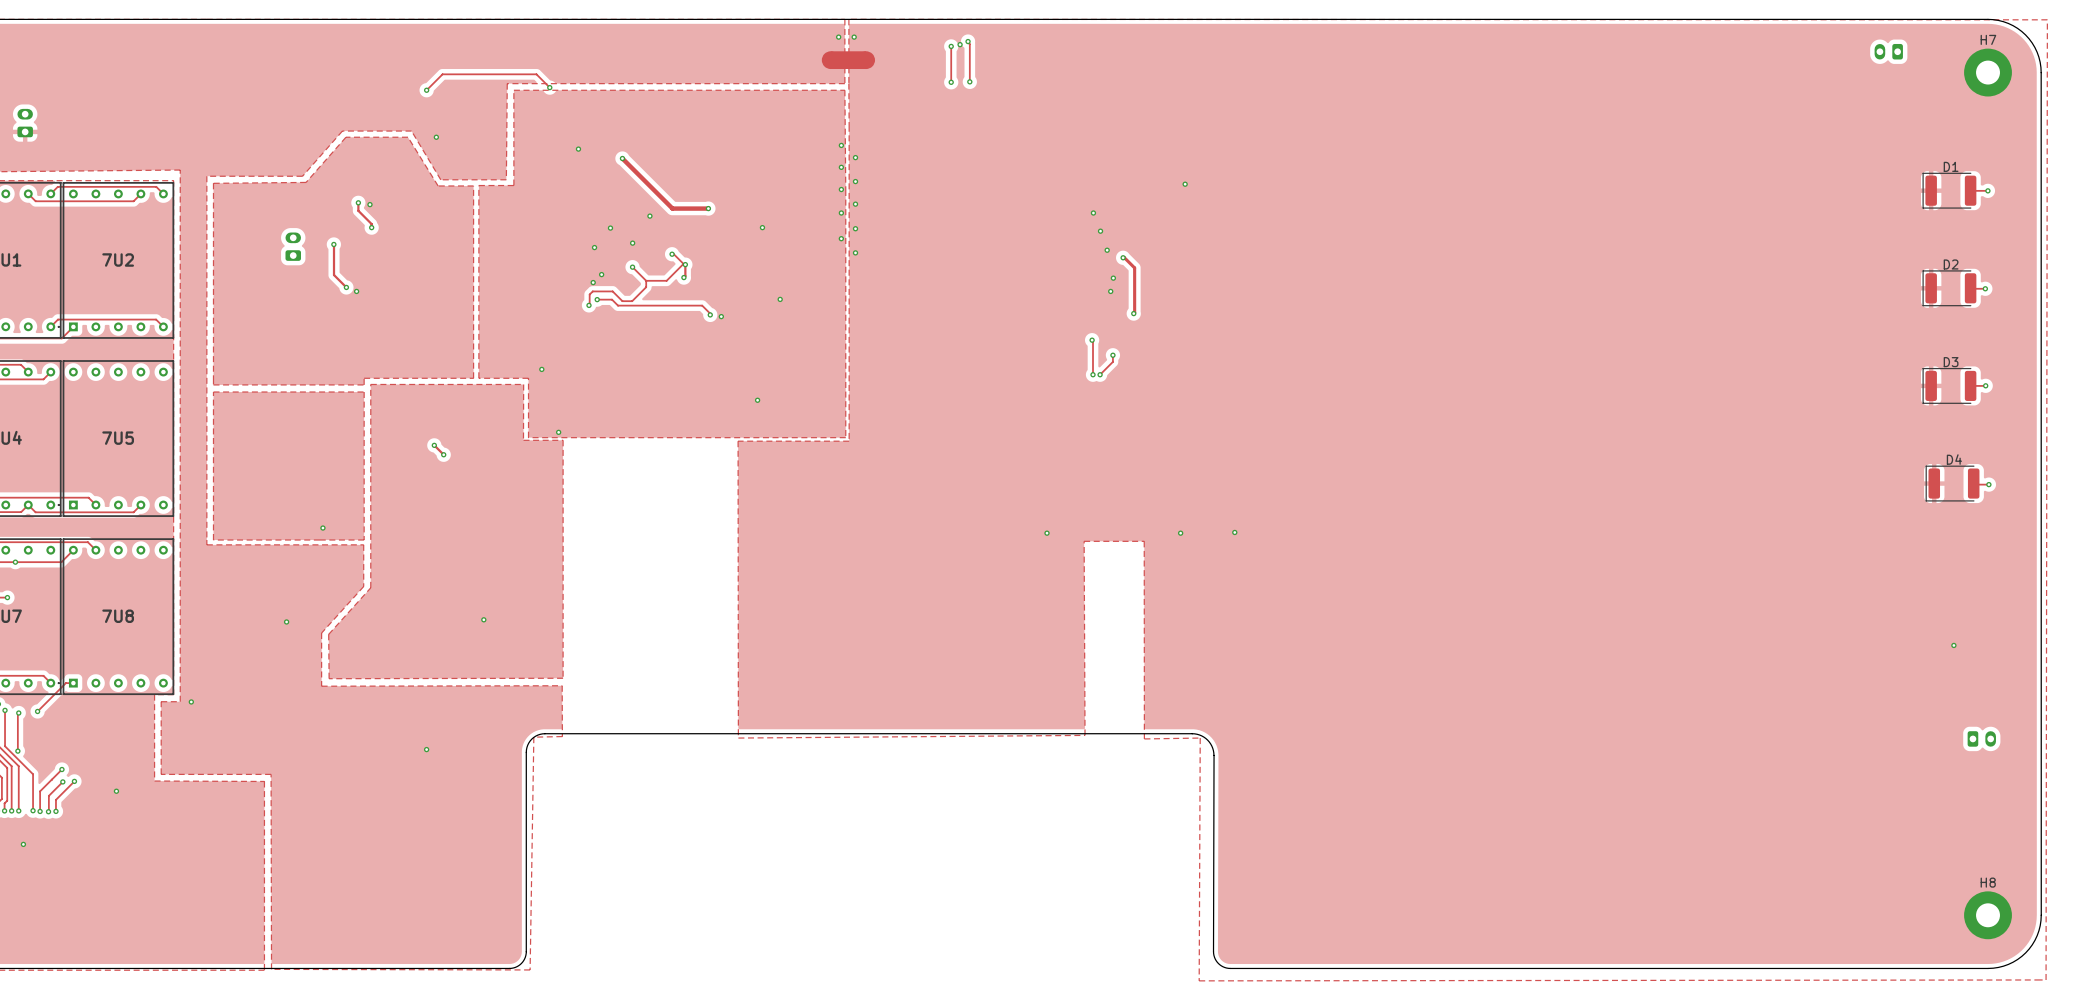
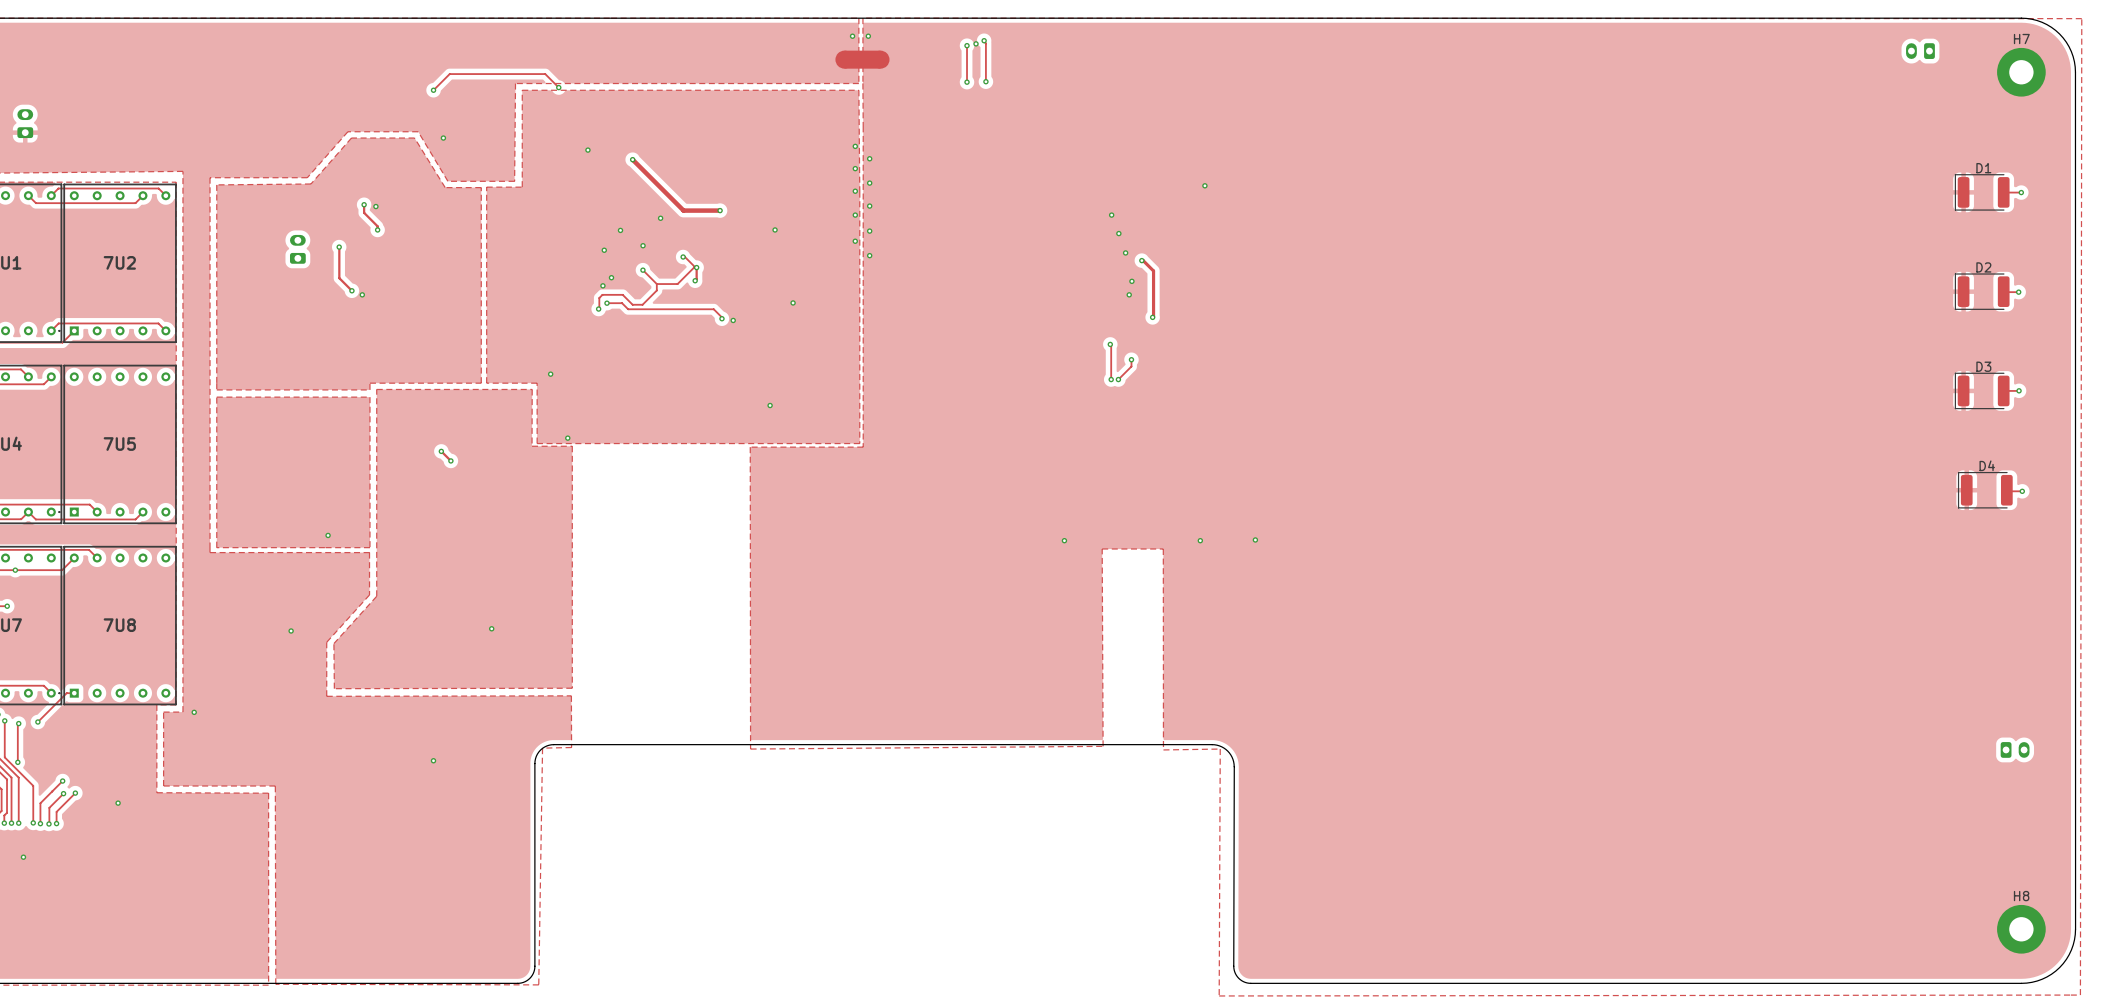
via: (1953, 645) -> none

